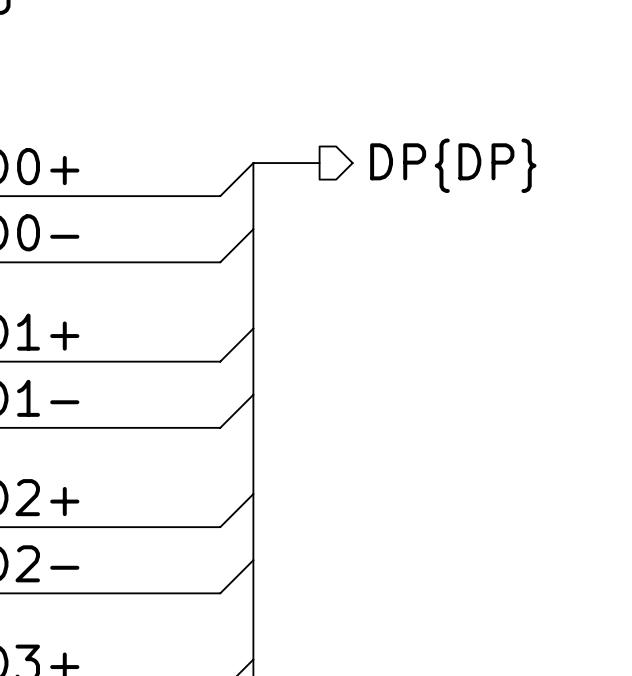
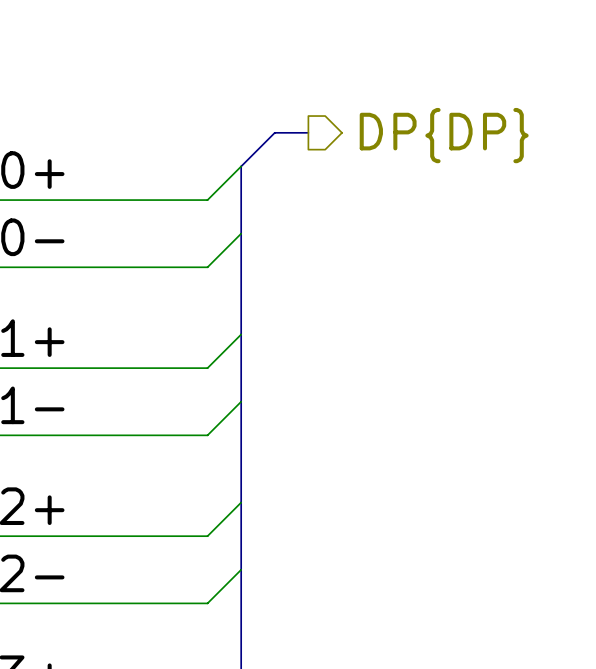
bus: (253, 163) (319, 163) -> (241, 166) (274, 132) (308, 132)
hierarchical label position: DP{DP} (453, 165) -> DP{DP} (444, 135)

